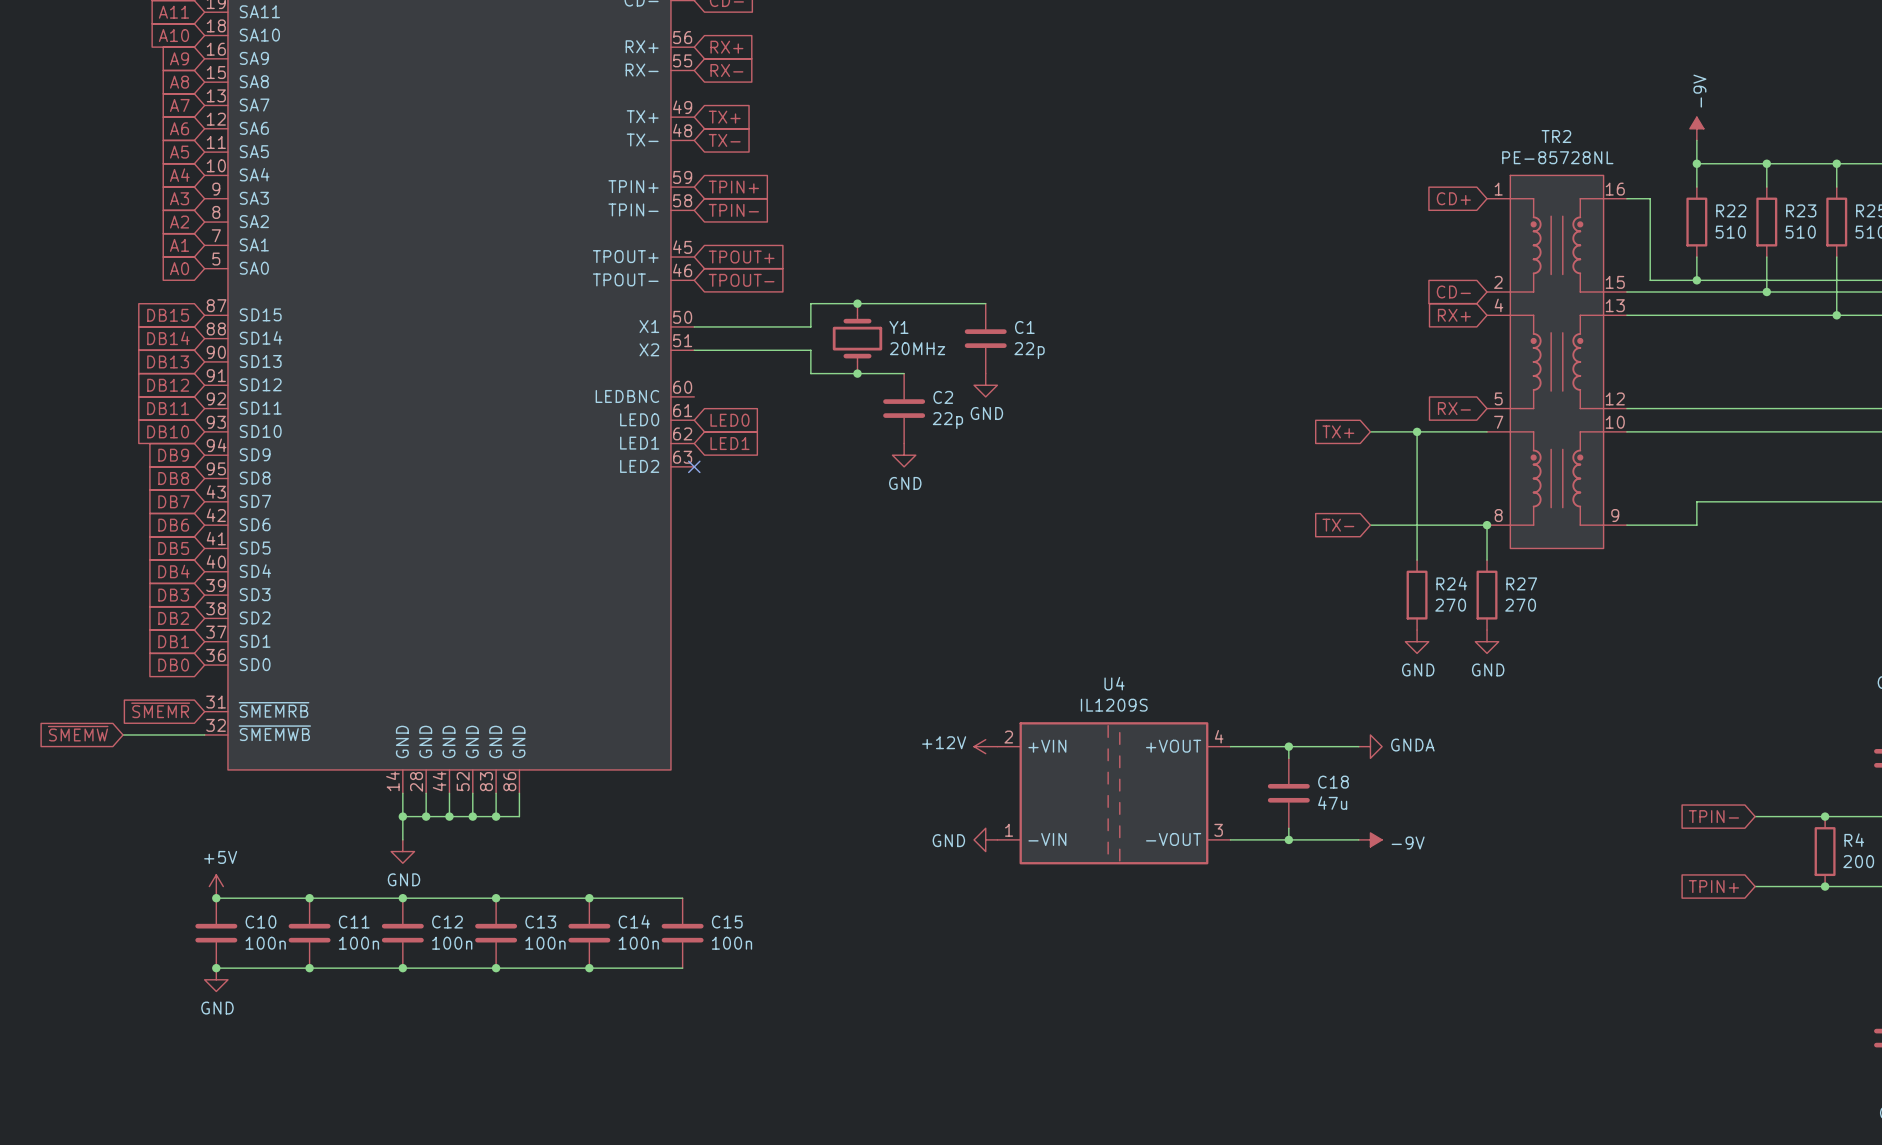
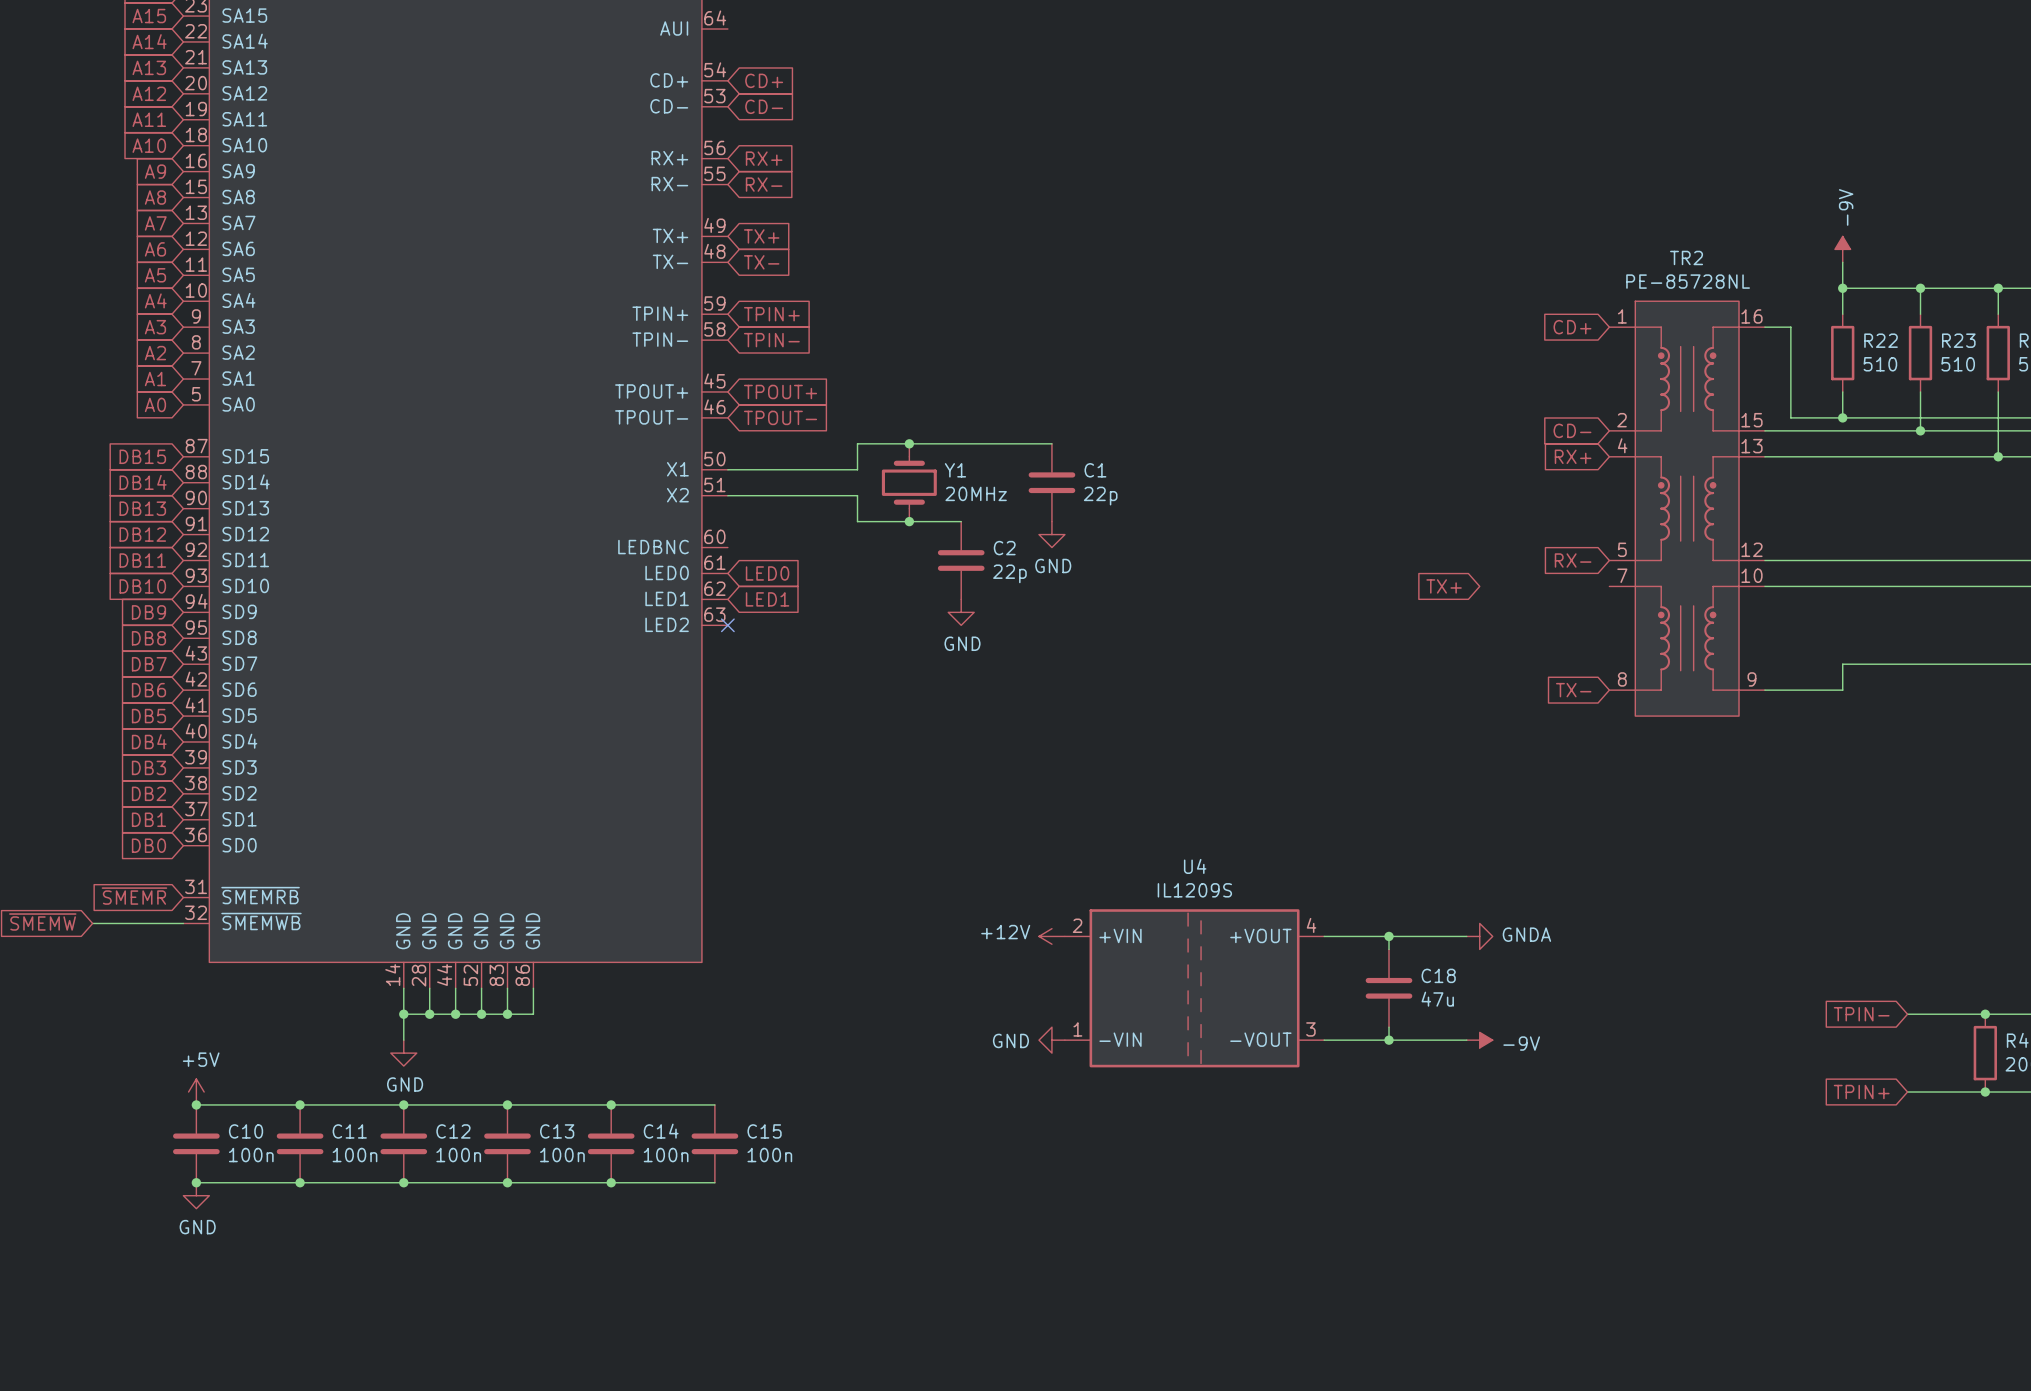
wire: (1370, 431) (1487, 431) -> none
wire: (1417, 431) (1417, 560) -> none
junction: (1417, 431) -> none
global label position: TX- (1338, 525) -> TX- (1573, 690)
wire: (1370, 525) (1487, 525) (1487, 560) -> none
junction: (1487, 525) -> none
R24: 270 (1417, 595) -> none
R27: 270 (1487, 595) -> none
power symbol: GND (1417, 641) -> none
power symbol: GND (1487, 641) -> none

